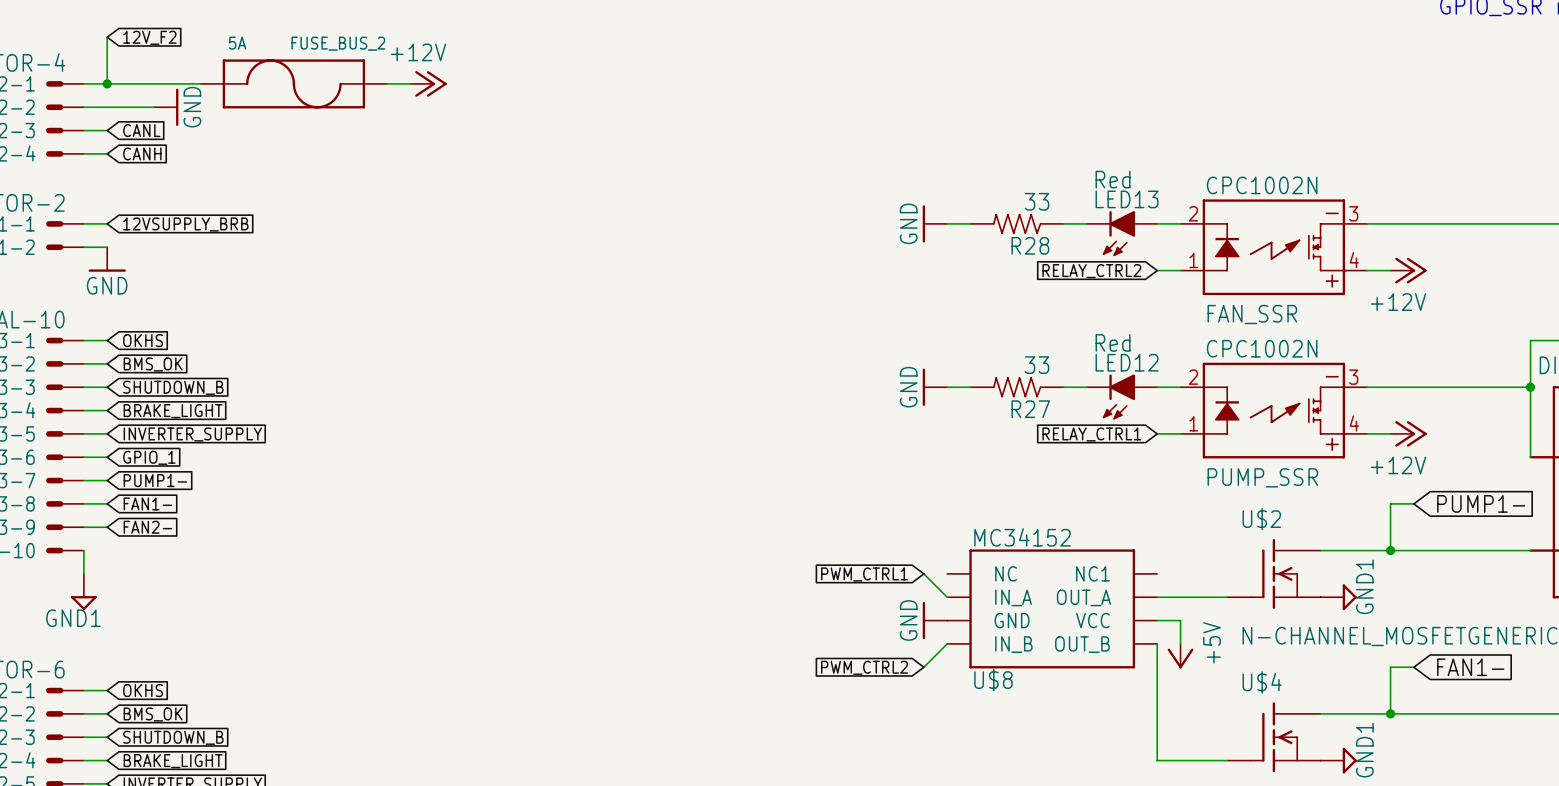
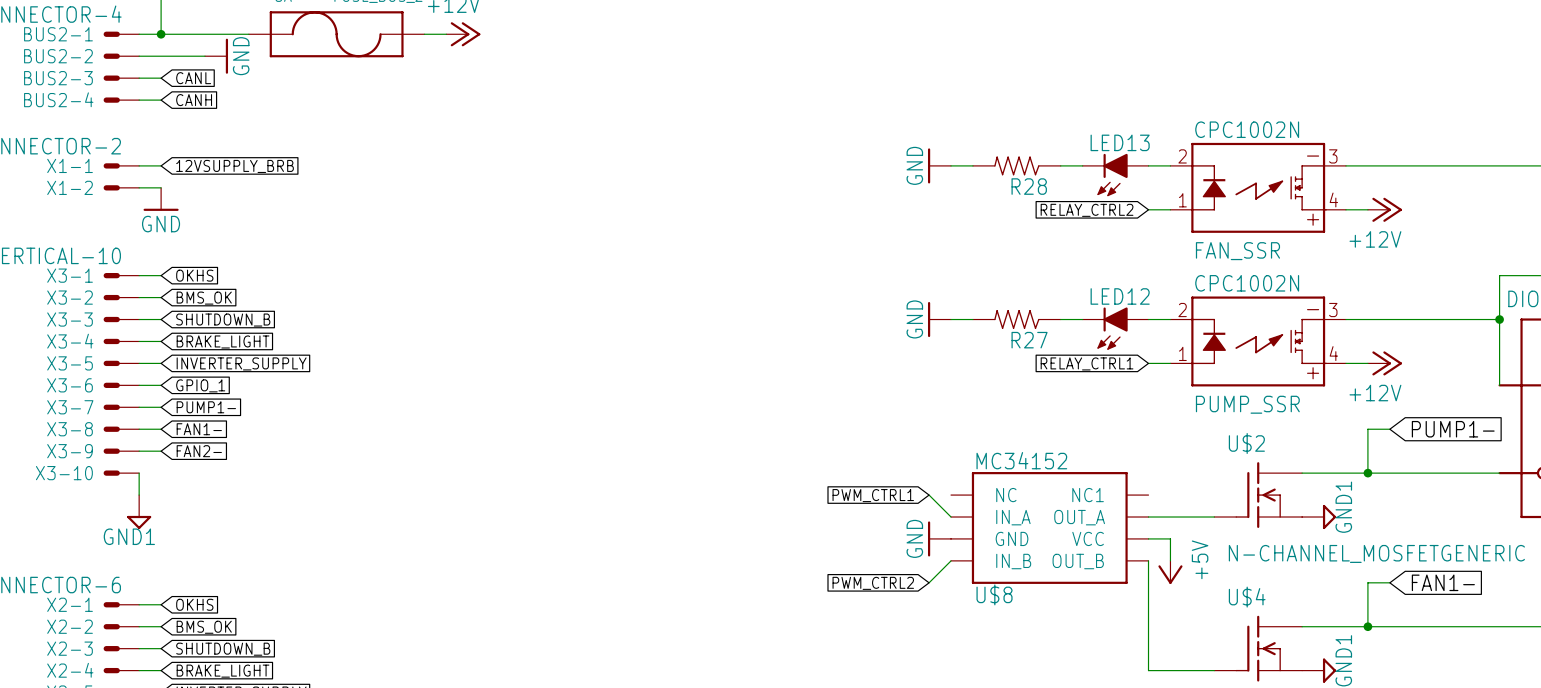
LED13 value: Red (1113, 179) -> none
R28 value: 33 (1037, 201) -> none
LED12 value: Red (1113, 342) -> none
R27 value: 33 (1037, 365) -> none

